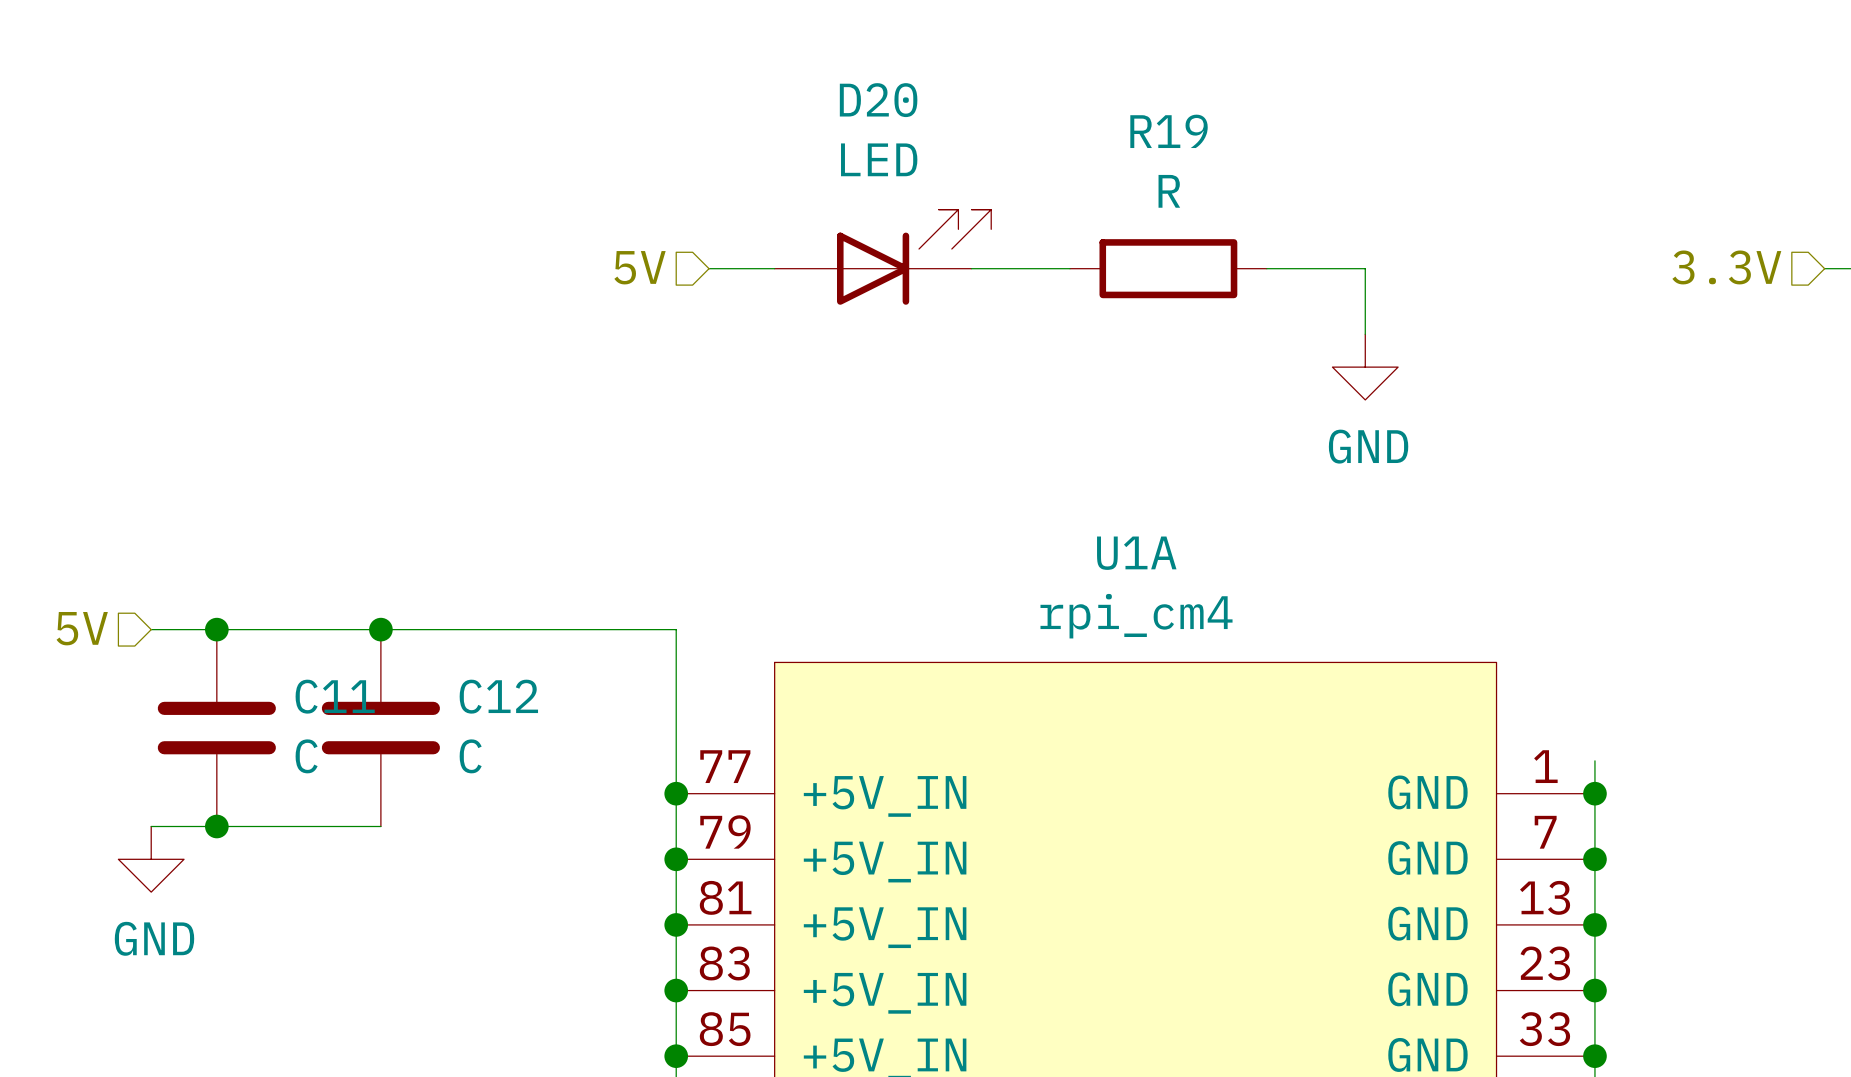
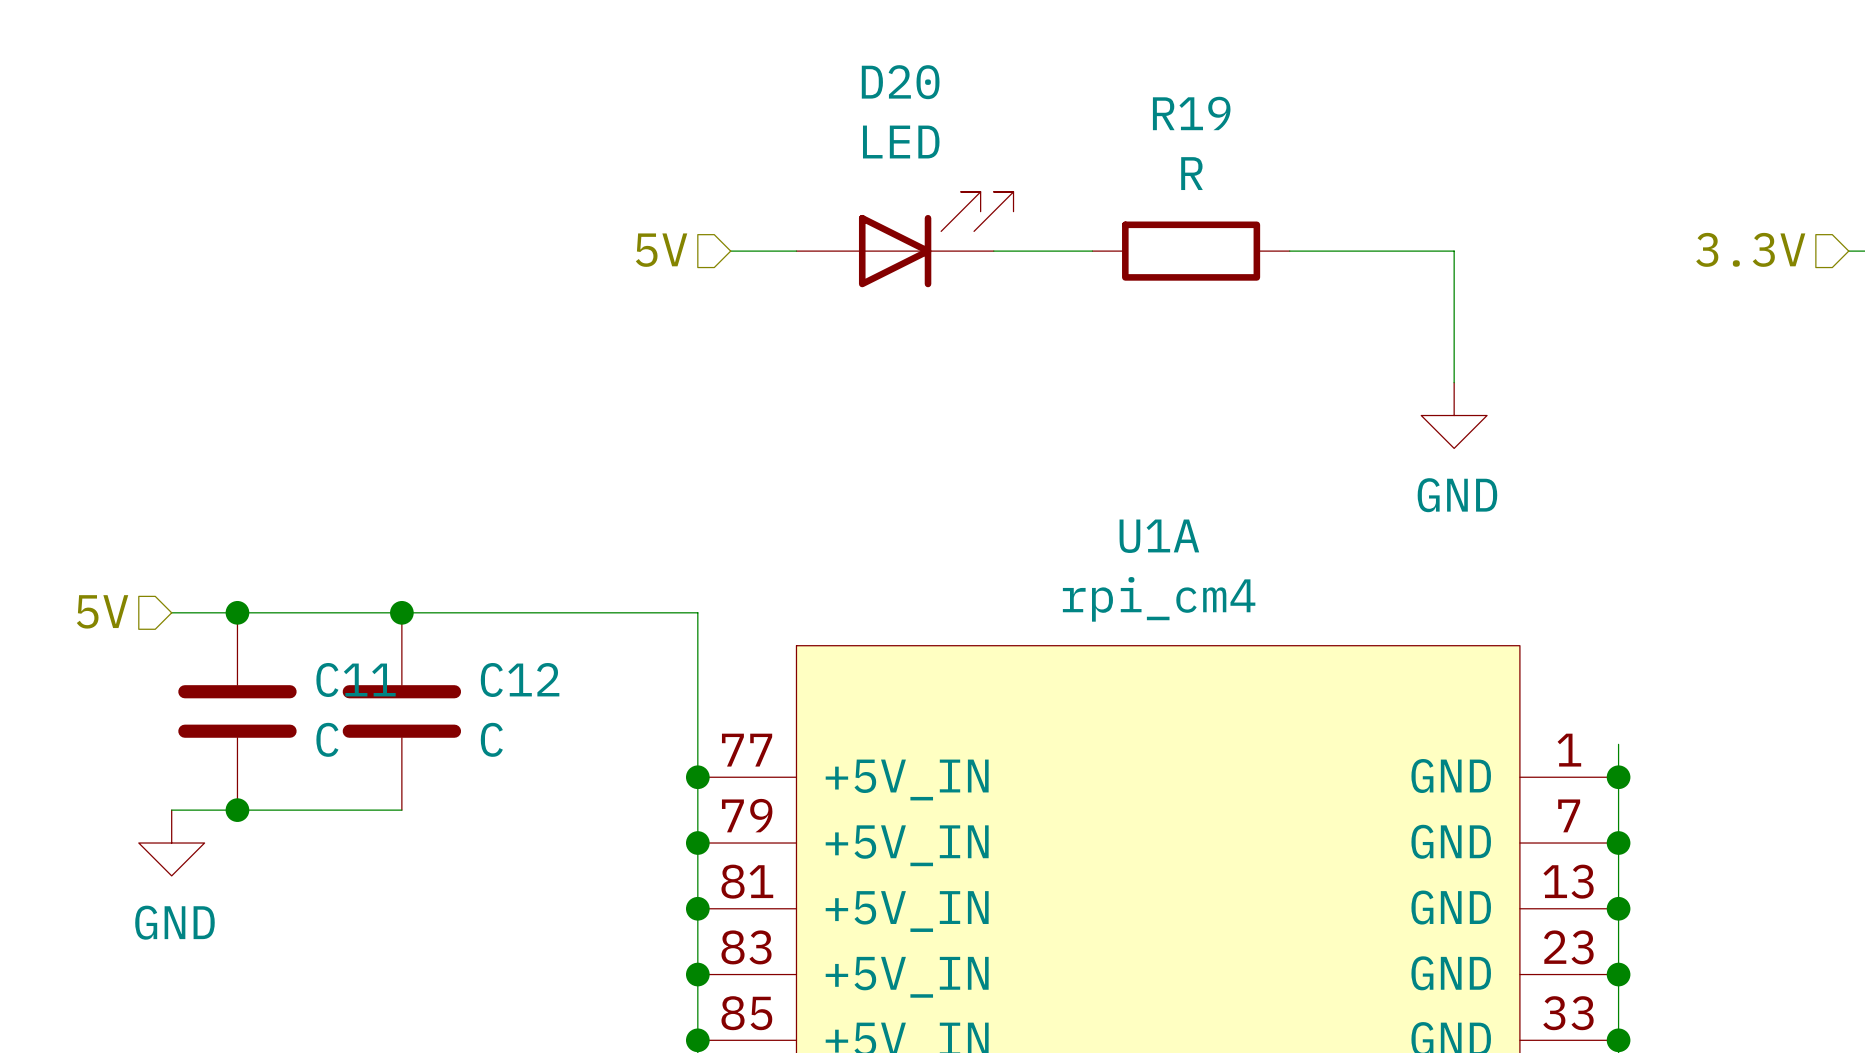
wire: (1365, 268) (1365, 334) -> (1388, 251) (1454, 251) (1454, 382)
power symbol position: GND (1365, 367) -> GND (1454, 415)

